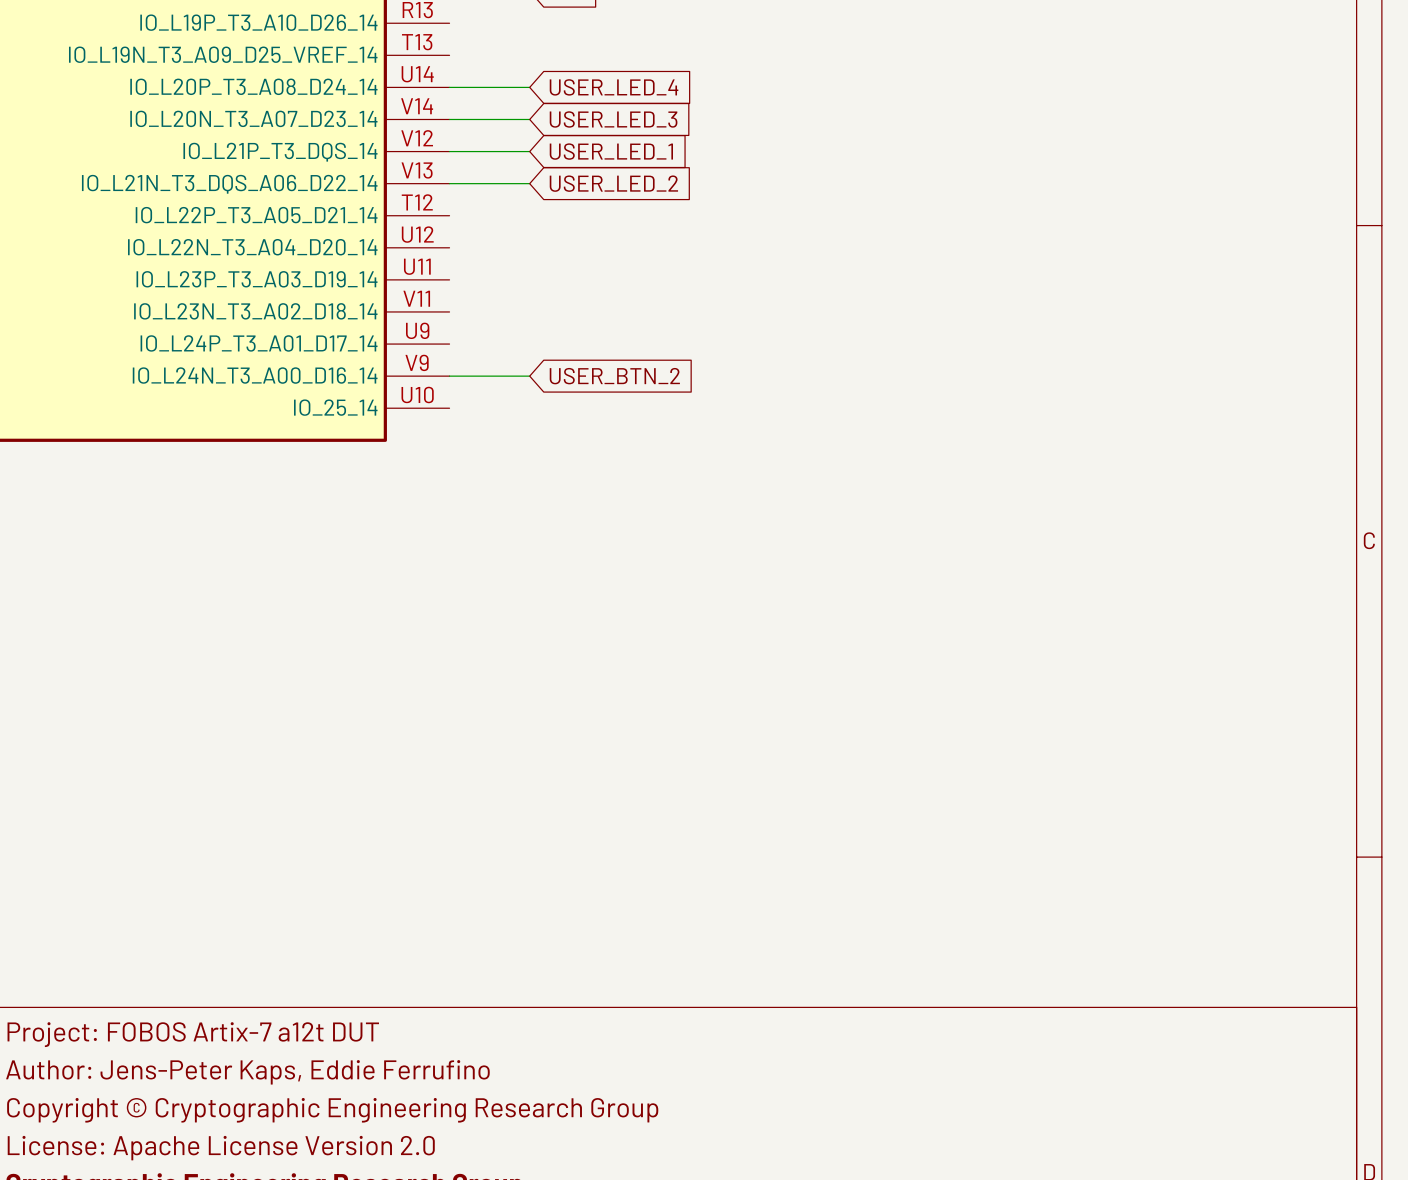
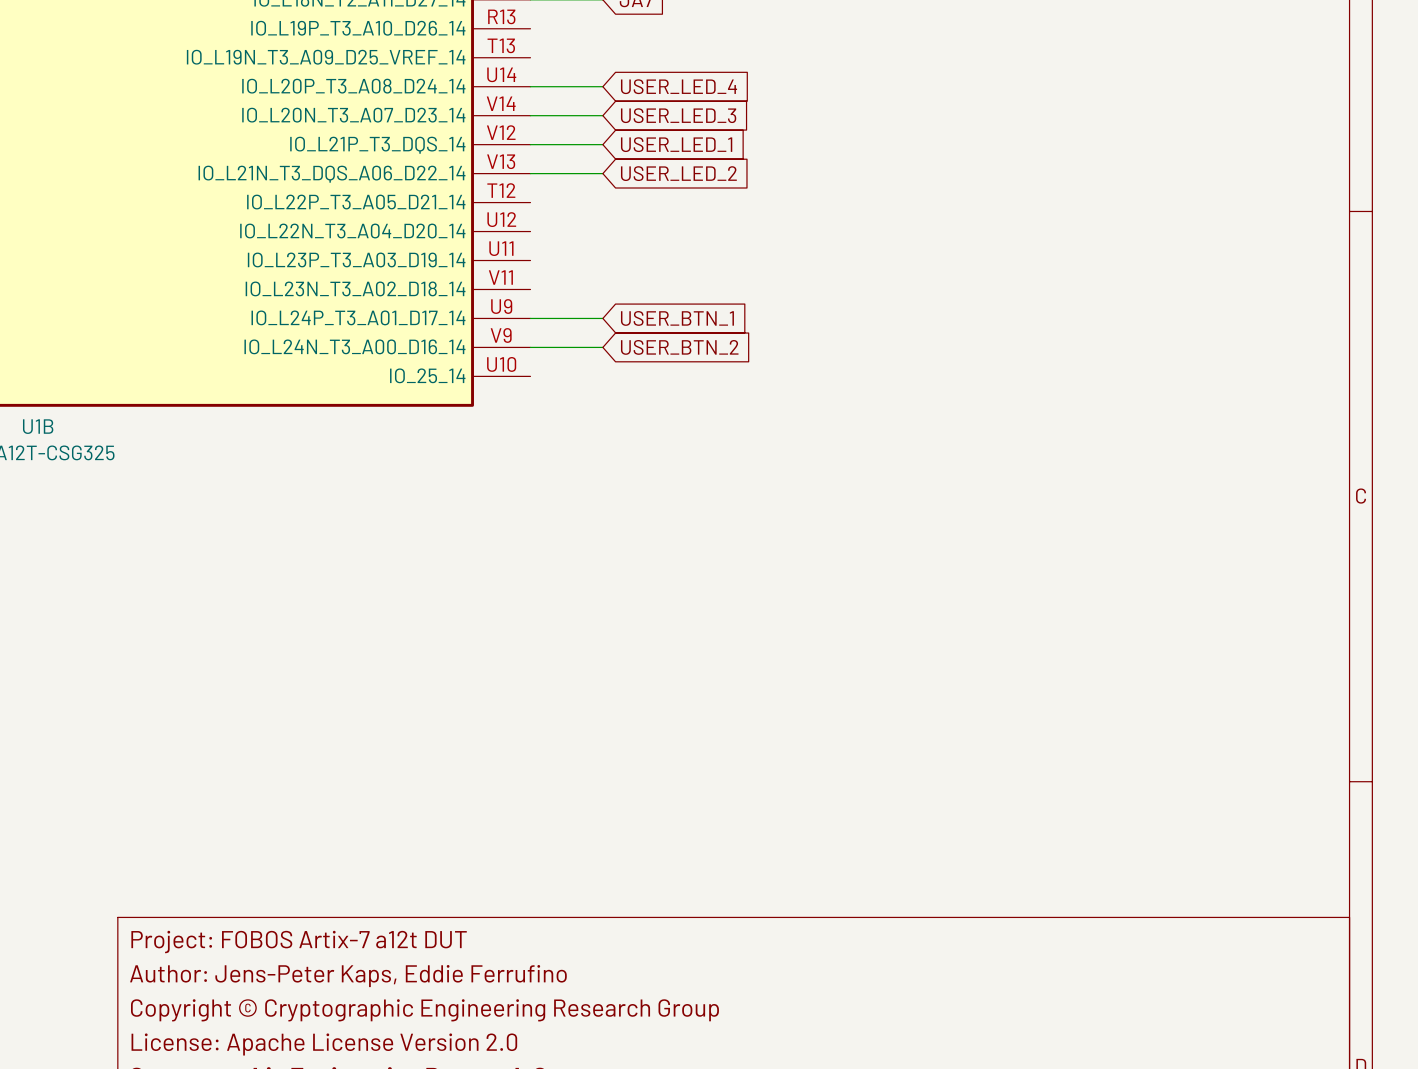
wire: none -> (530, 318) (602, 318)
global label: none -> USER_BTN_1 (677, 318)

